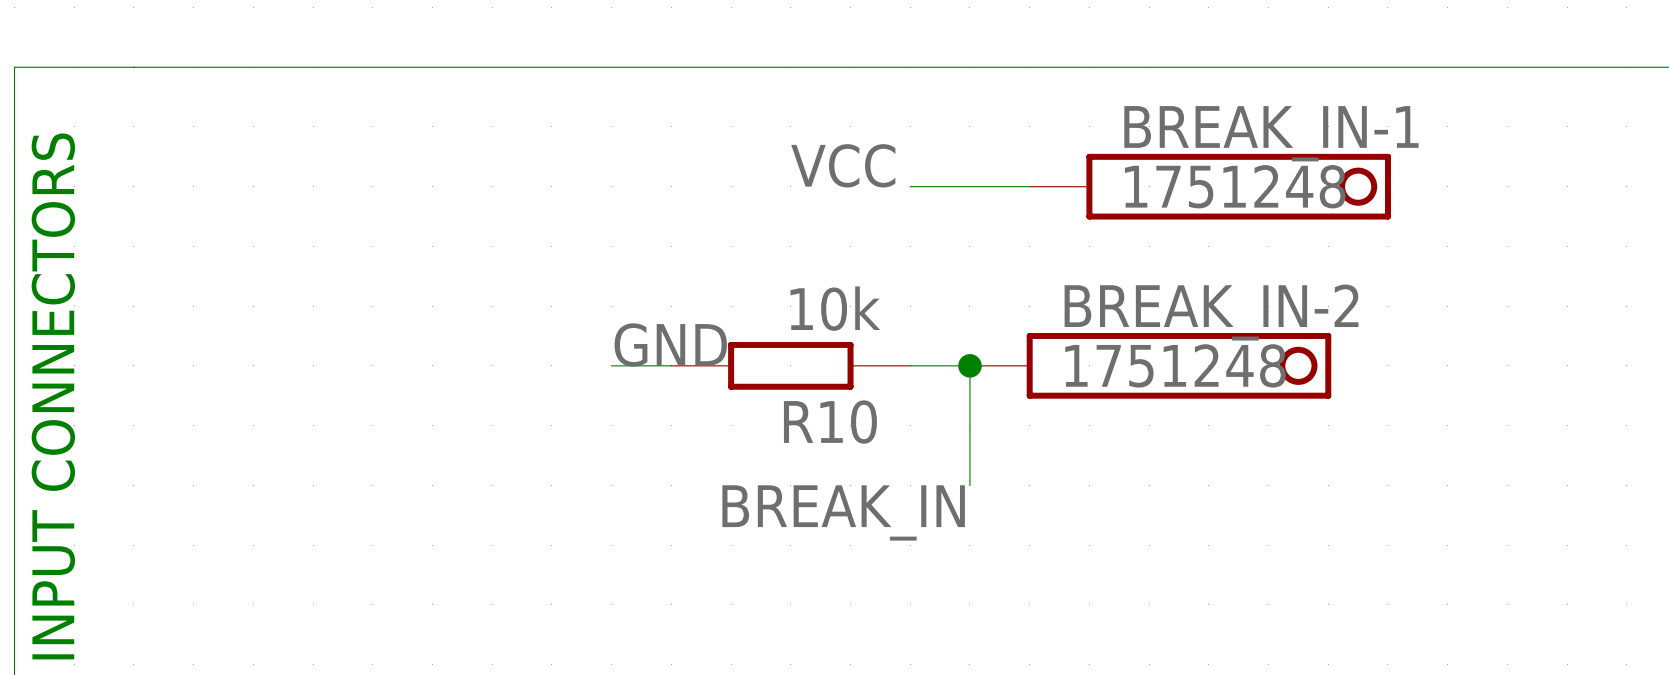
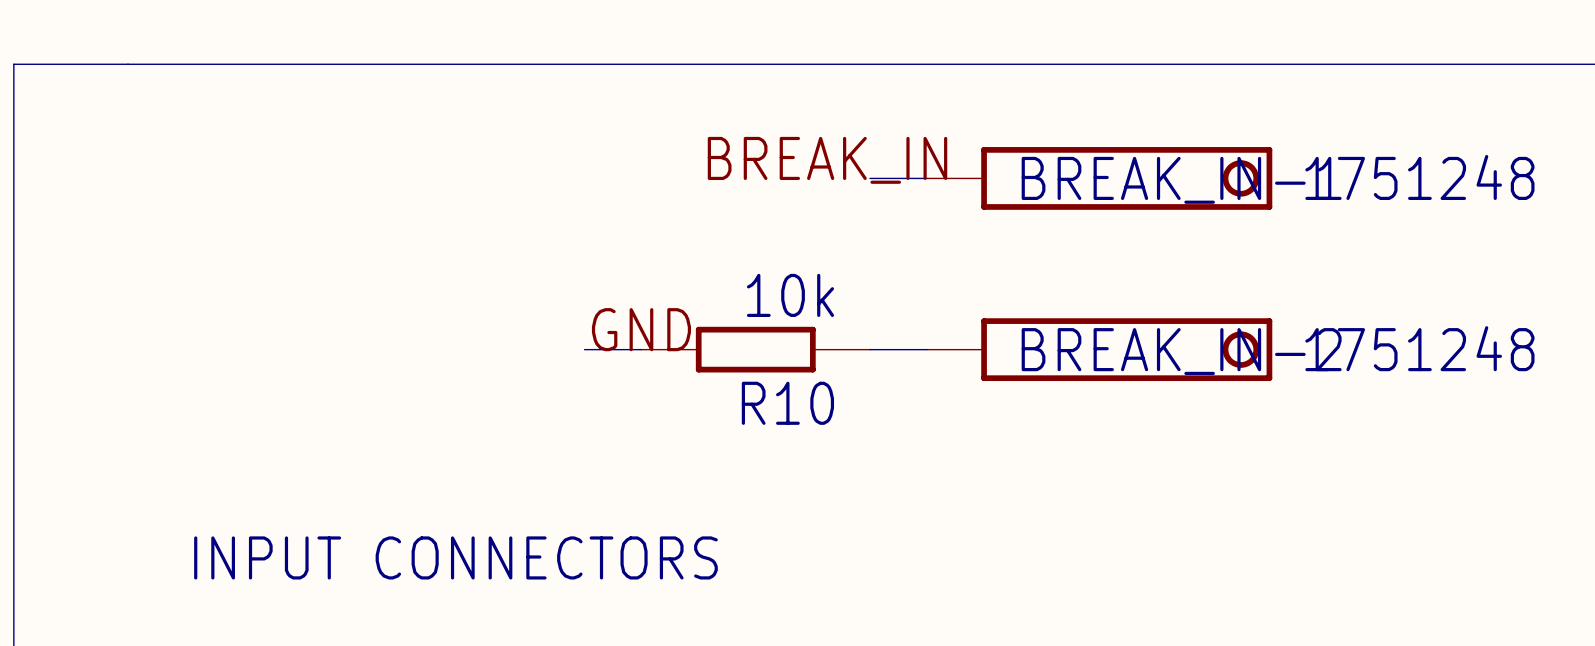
BREAK_IN-1 name position: BREAK_IN-1 (1271, 133) -> BREAK_IN-1 (1181, 180)
label: VCC (843, 165) -> none
BREAK_IN-1 position: (1210, 186) -> (1099, 178)
BREAK_IN-1 value position: 1751248 (1235, 186) -> 1751248 (1419, 177)
BREAK_IN-2 name position: BREAK_IN-2 (1211, 312) -> BREAK_IN-2 (1181, 351)
wire: (969, 365) (969, 485) -> none
junction: (969, 365) -> none
BREAK_IN-2 value position: 1751248 (1175, 365) -> 1751248 (1419, 348)
text rotation: 0° (53, 396) -> 90° clockwise (455, 557)
label position: BREAK_IN (843, 512) -> BREAK_IN (827, 160)

